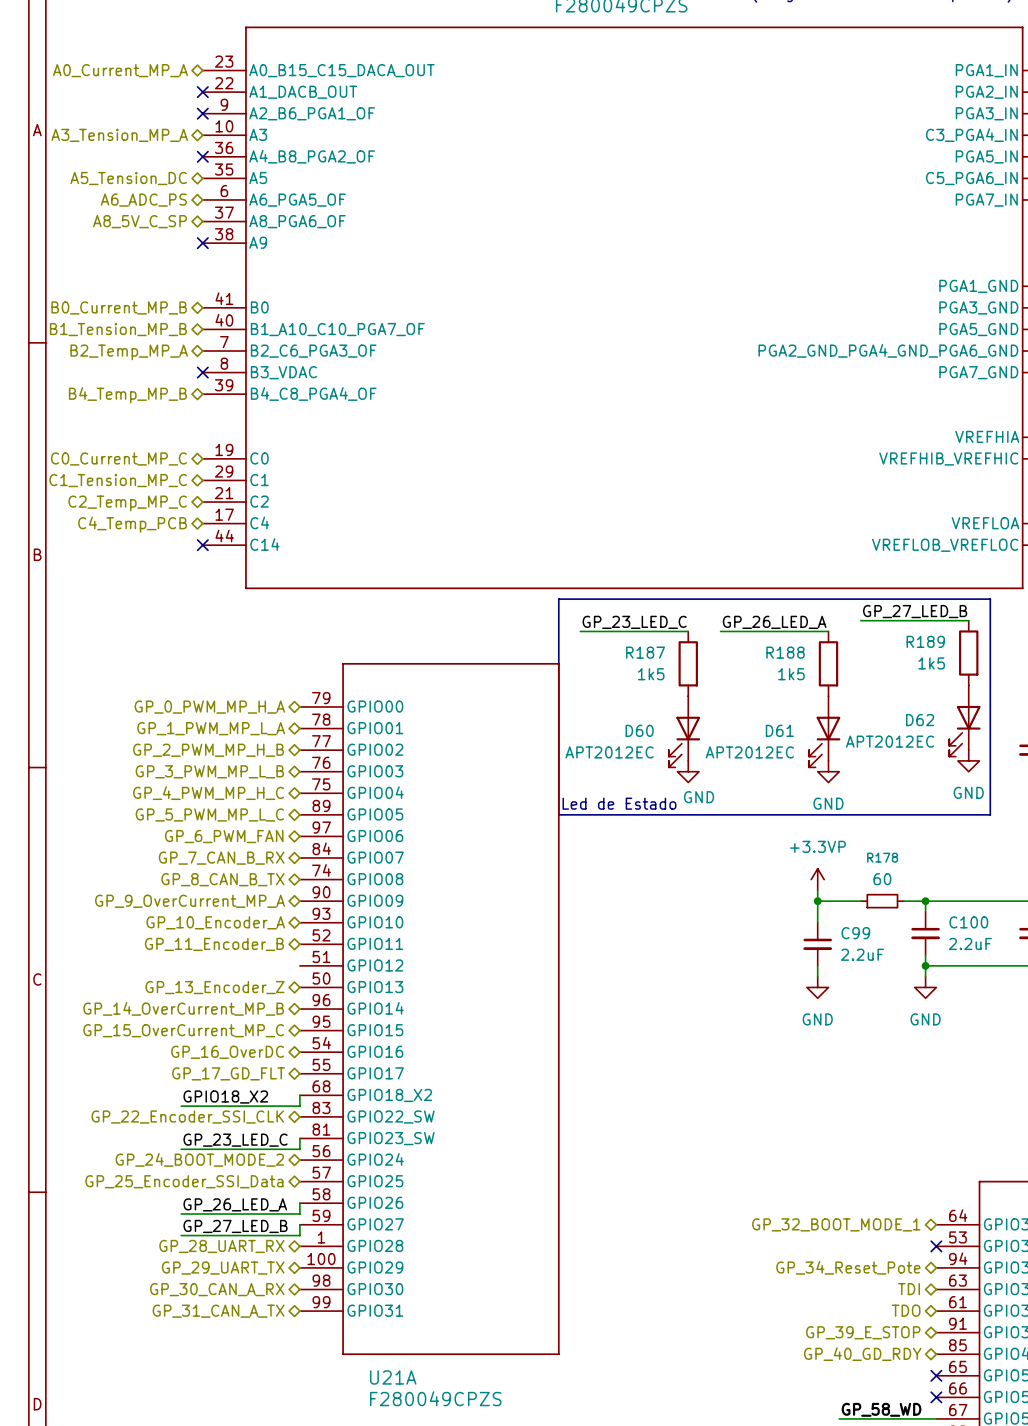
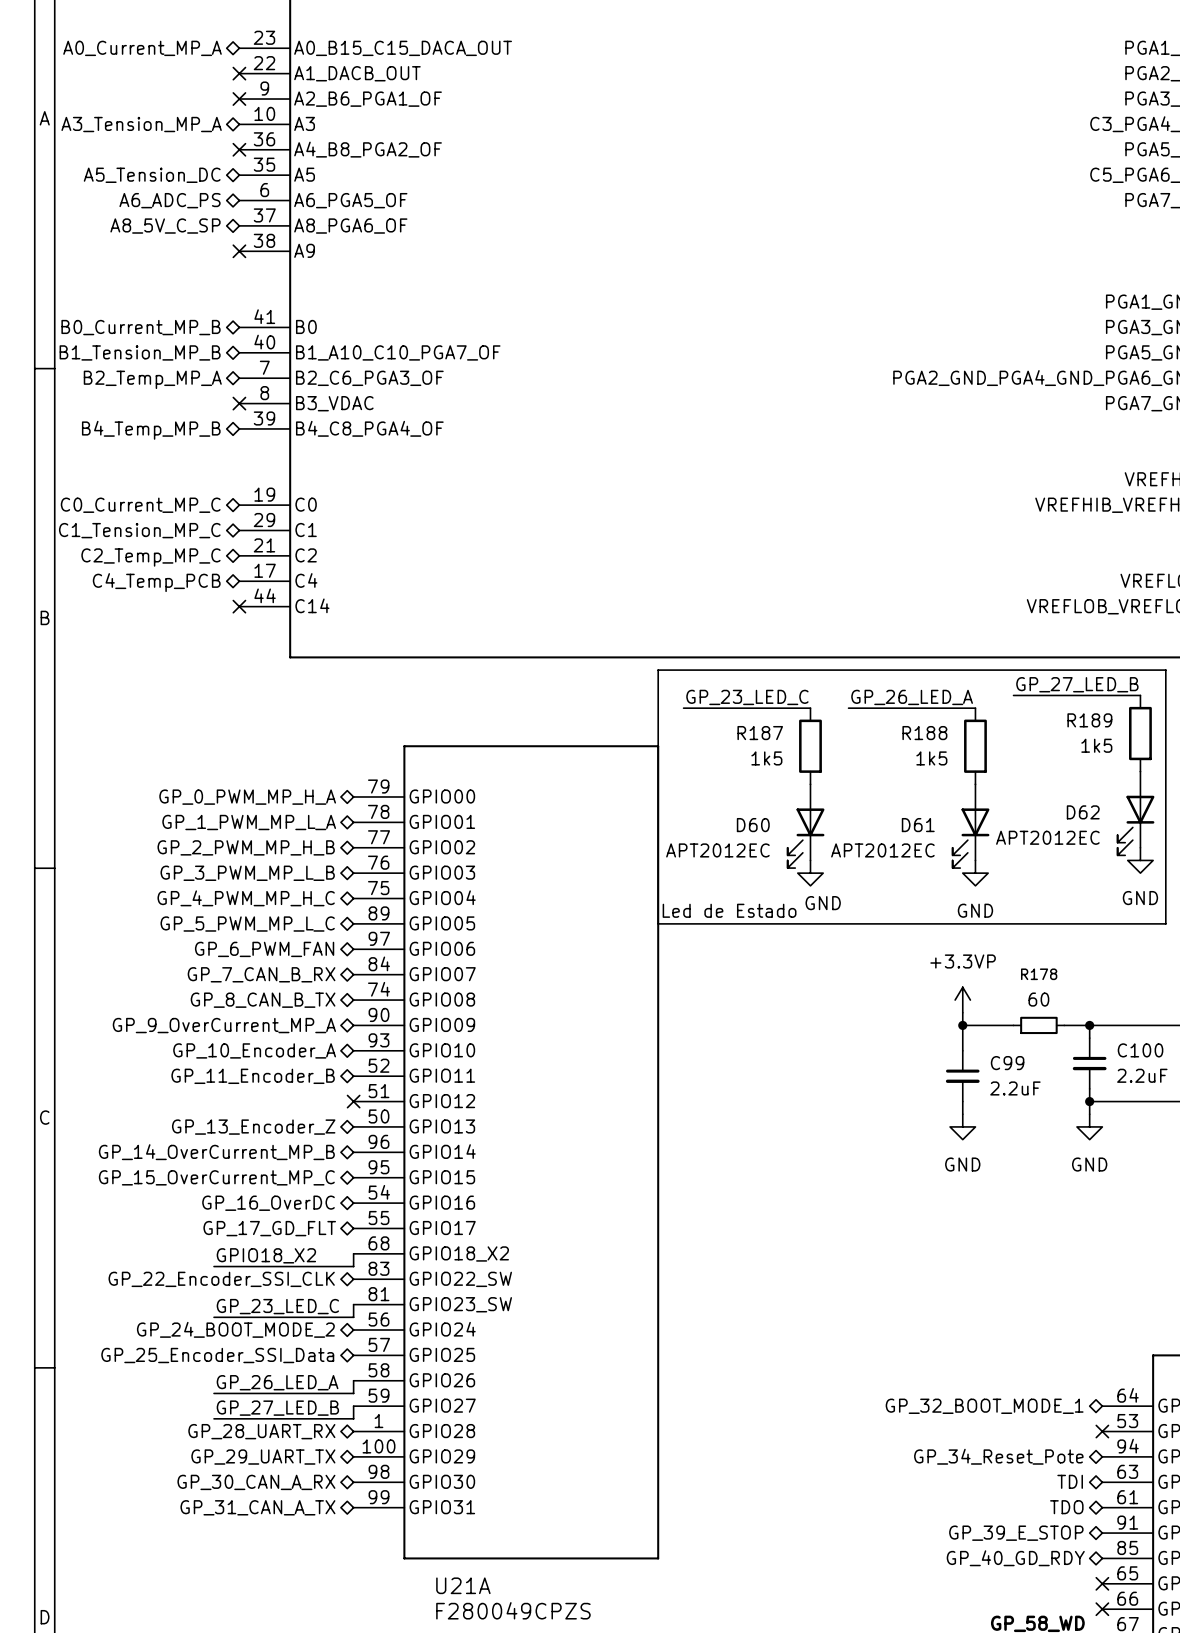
no-connect mark: none -> (353, 1101)

